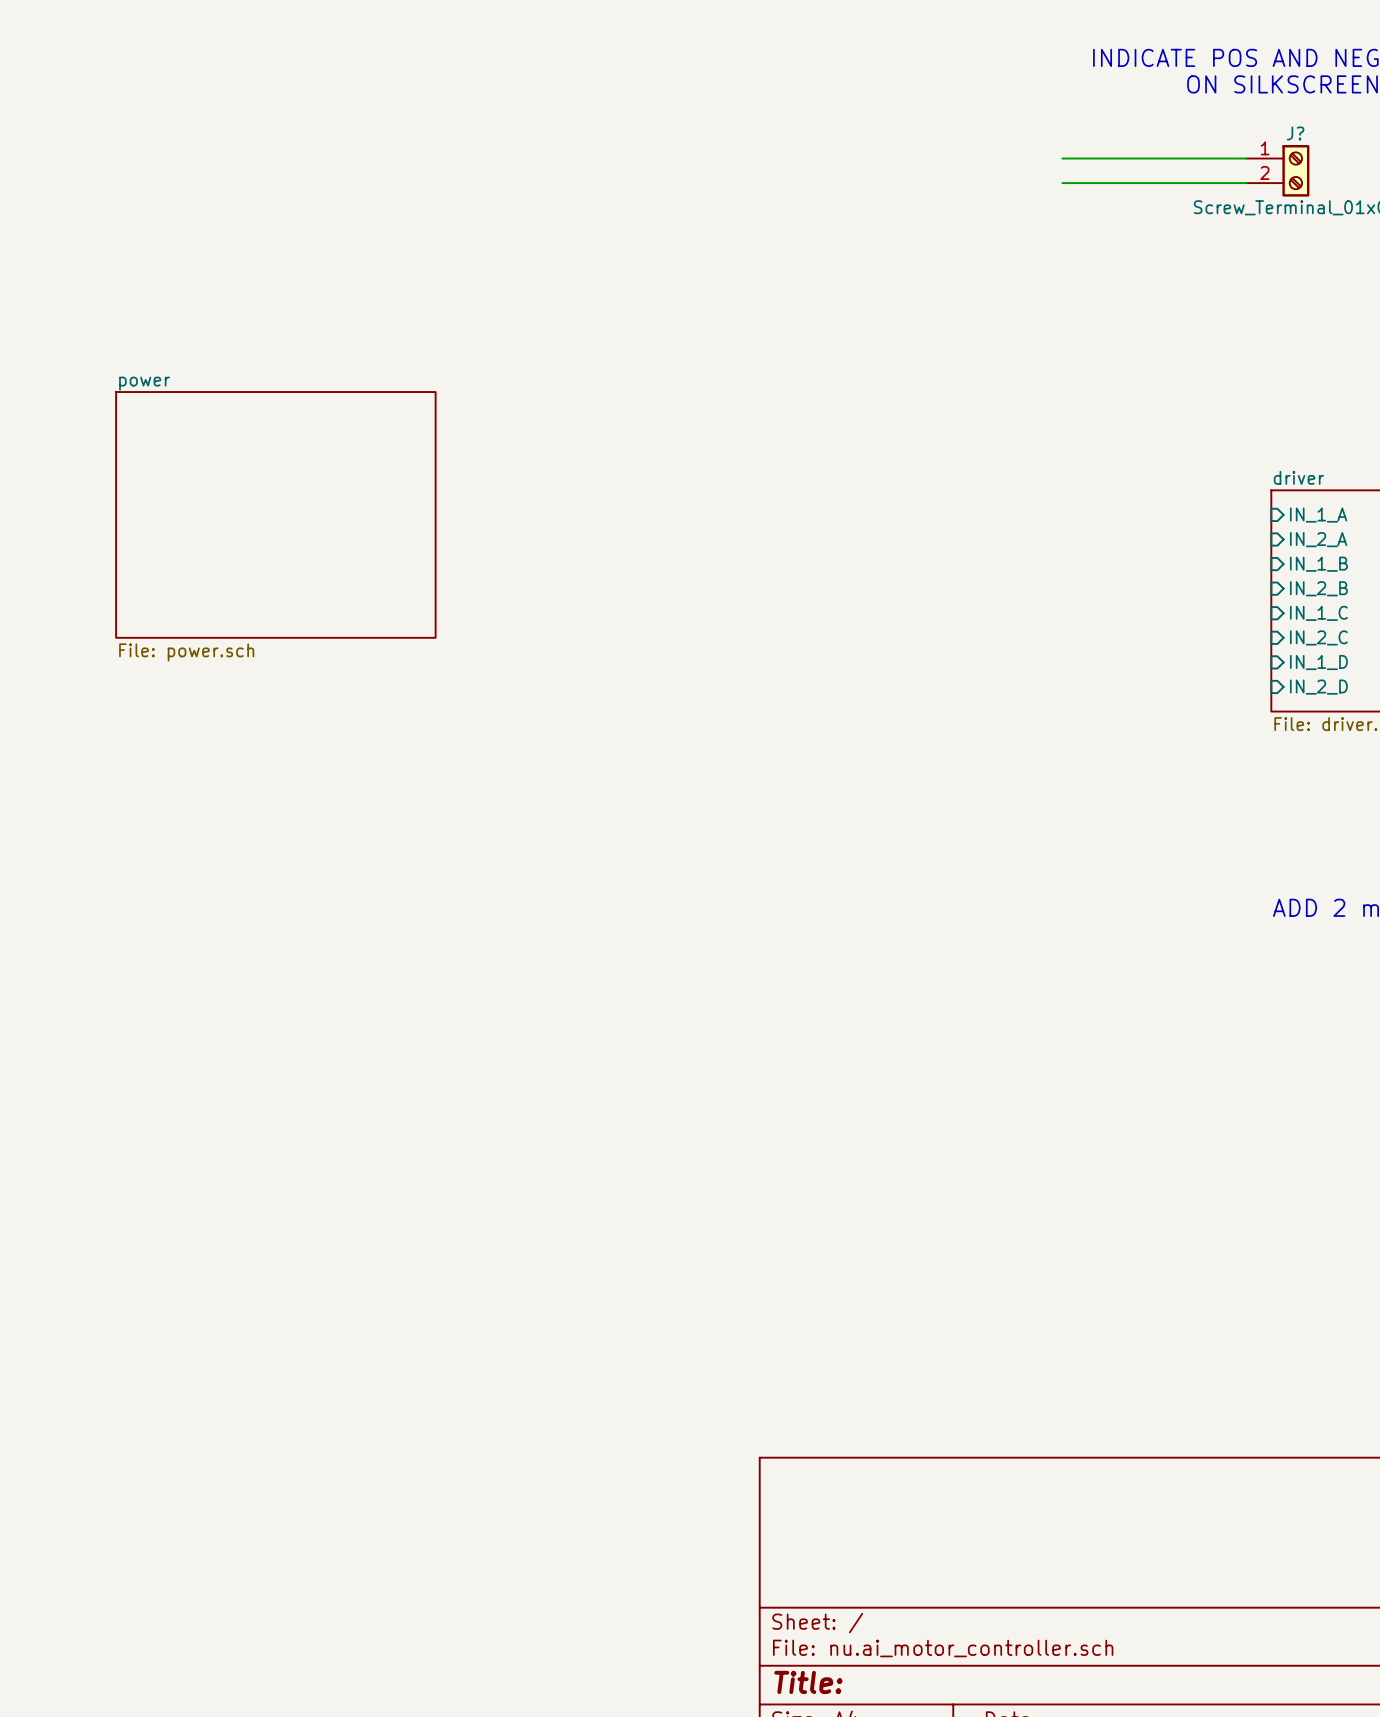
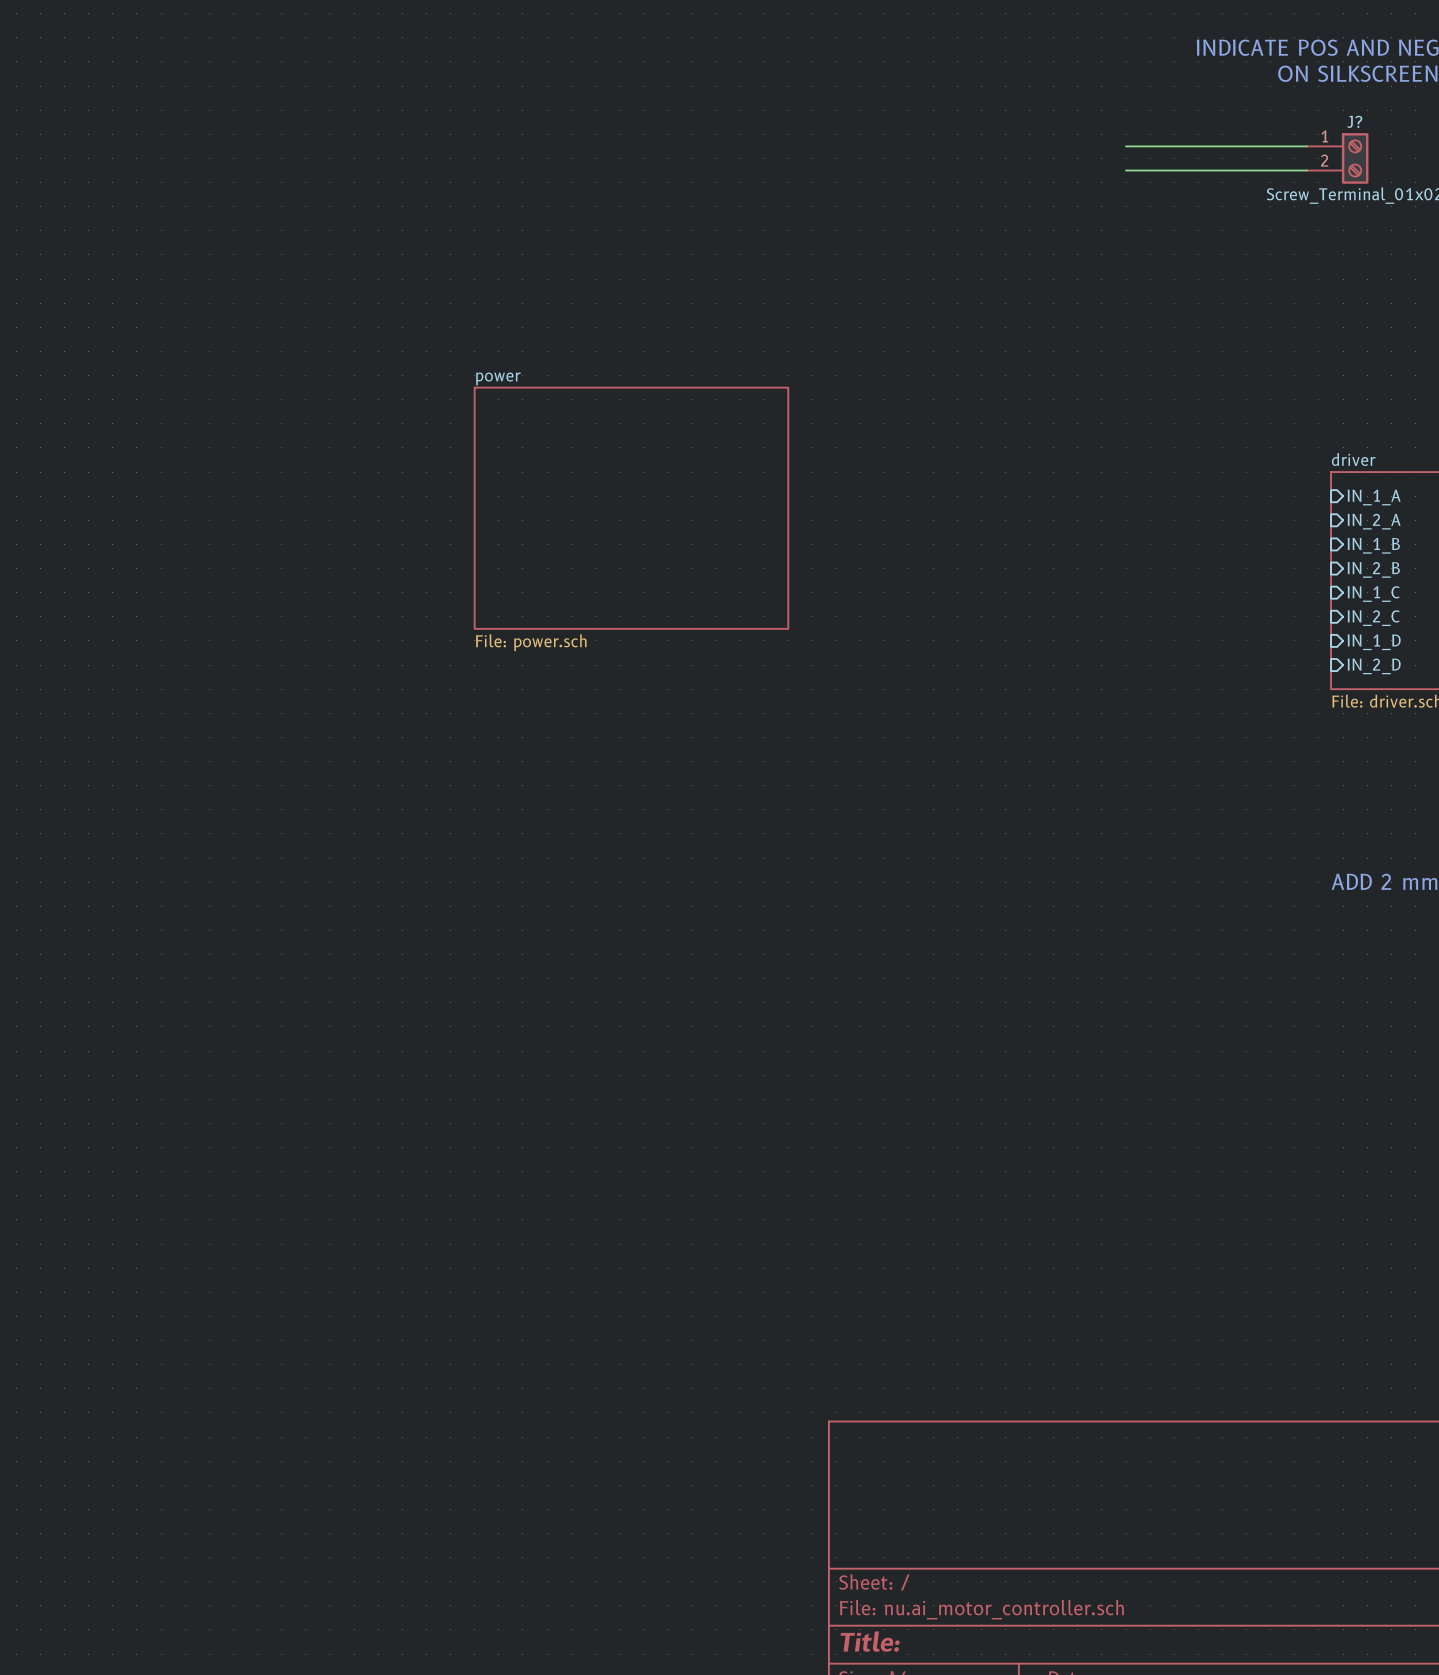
sheet power: File: power.sch (275, 514) -> none
sheet power: none -> File: power.sch (631, 508)

